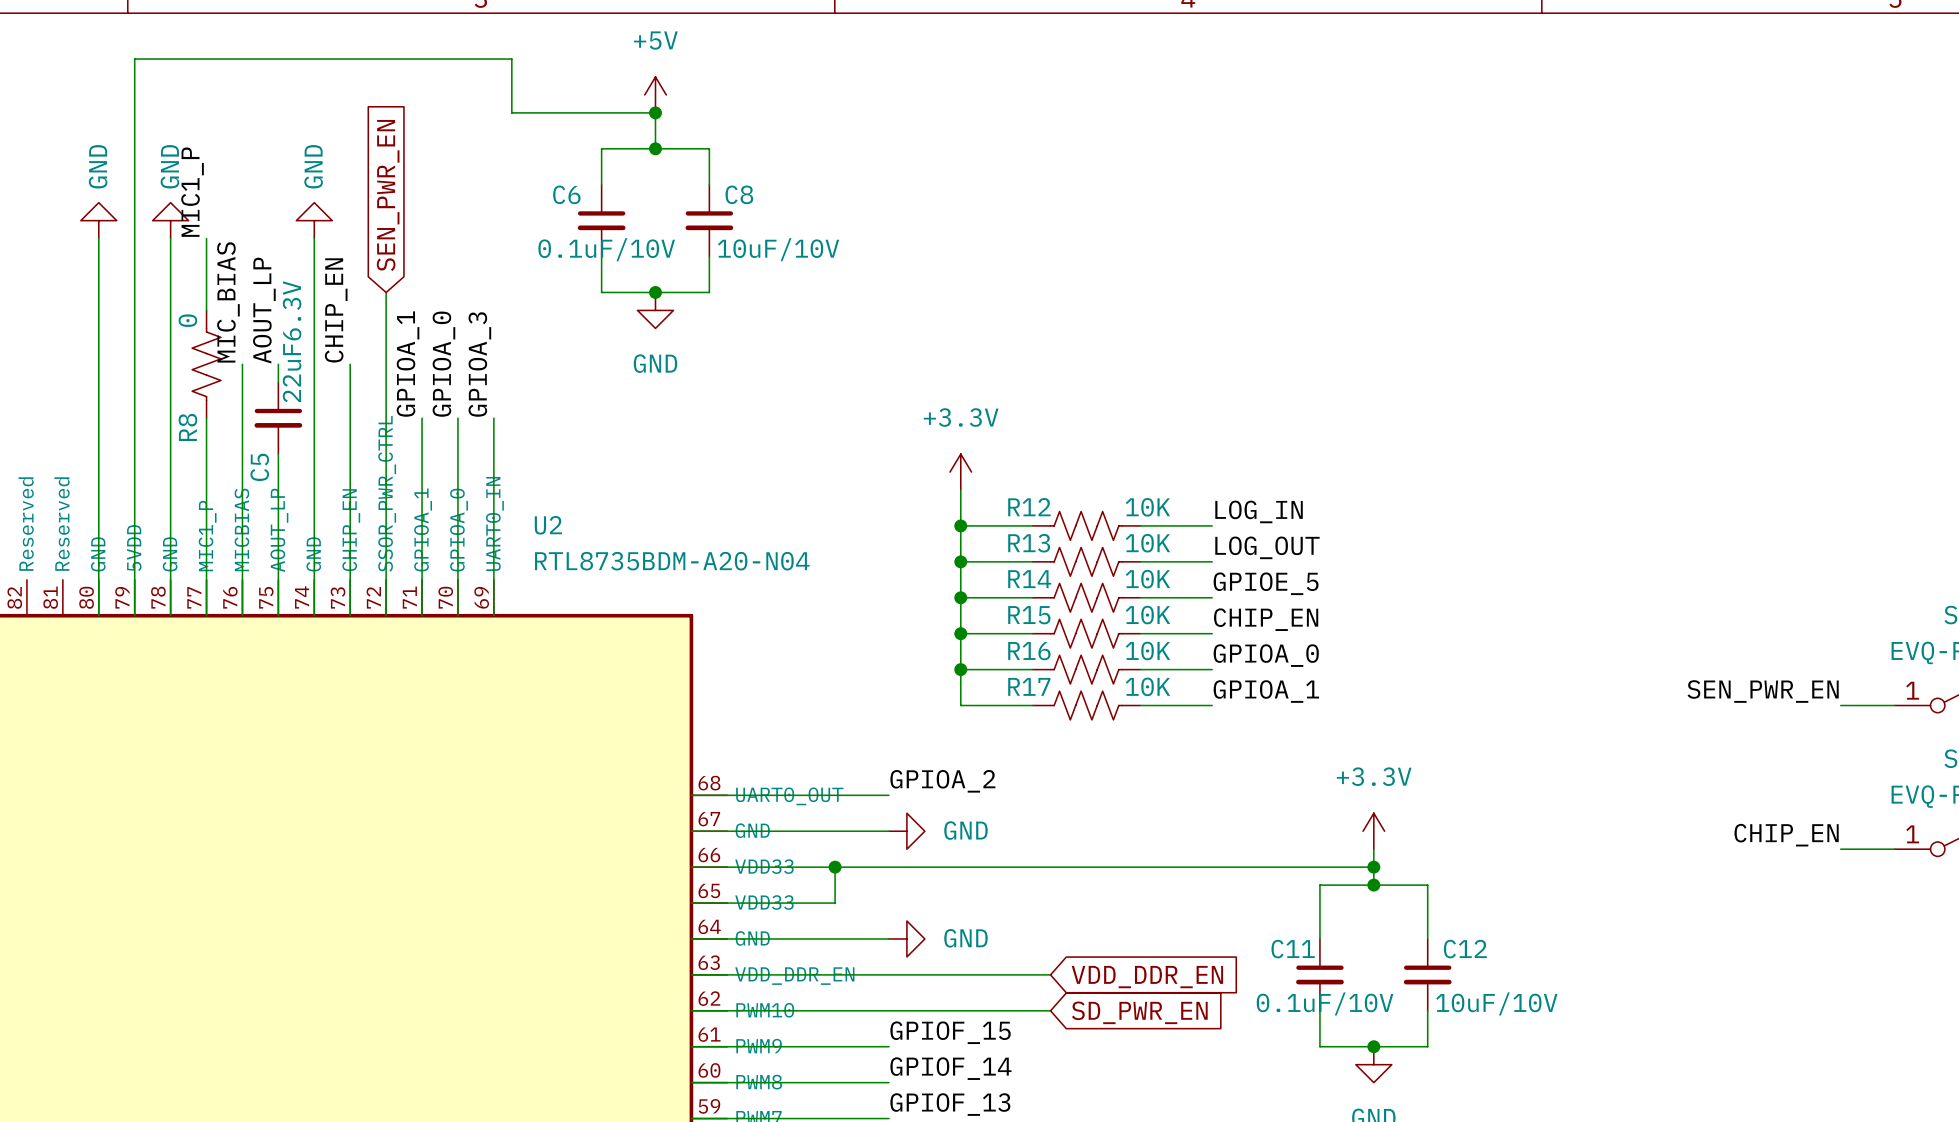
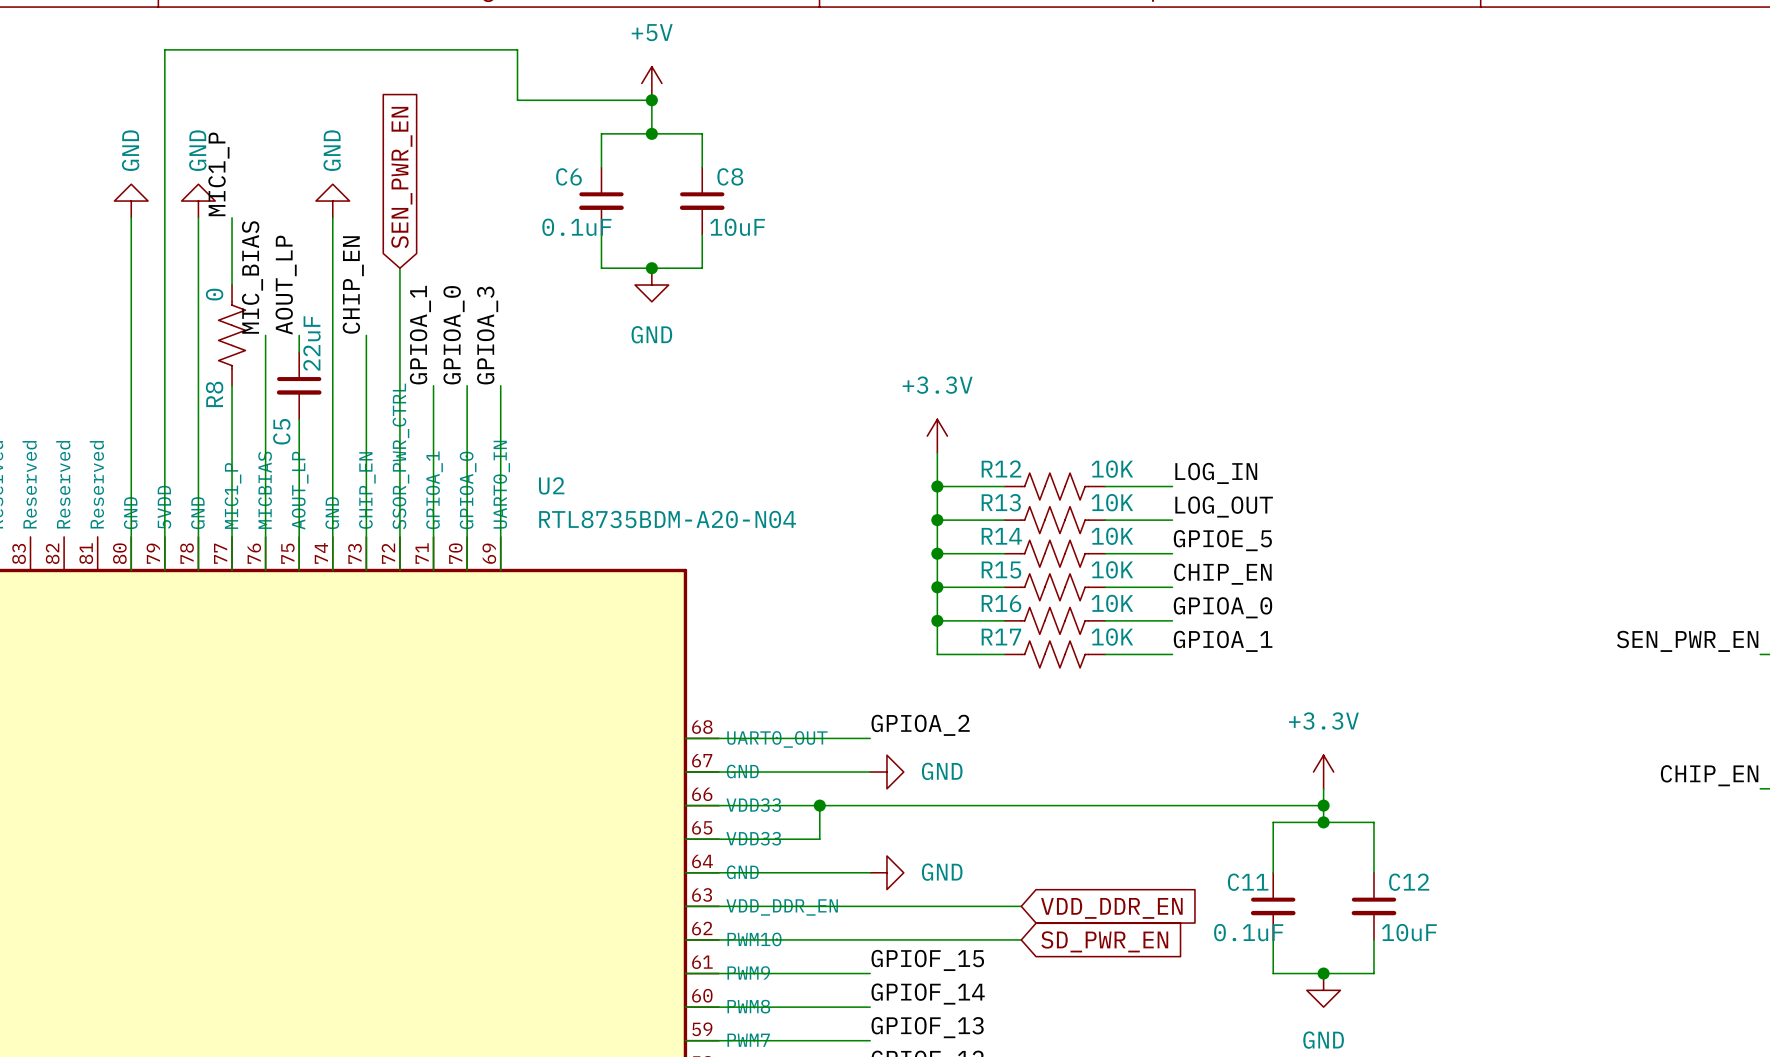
C6 value: 0.1uF/10V (606, 249) -> 0.1uF (576, 227)
C8 value: 10uF/10V (778, 249) -> 10uF (737, 227)
C5 value: 22uF6.3V (292, 341) -> 22uF (312, 343)
C11 value: 0.1uF/10V (1325, 1003) -> 0.1uF (1248, 932)
C12 value: 10uF/10V (1496, 1003) -> 10uF (1409, 932)

